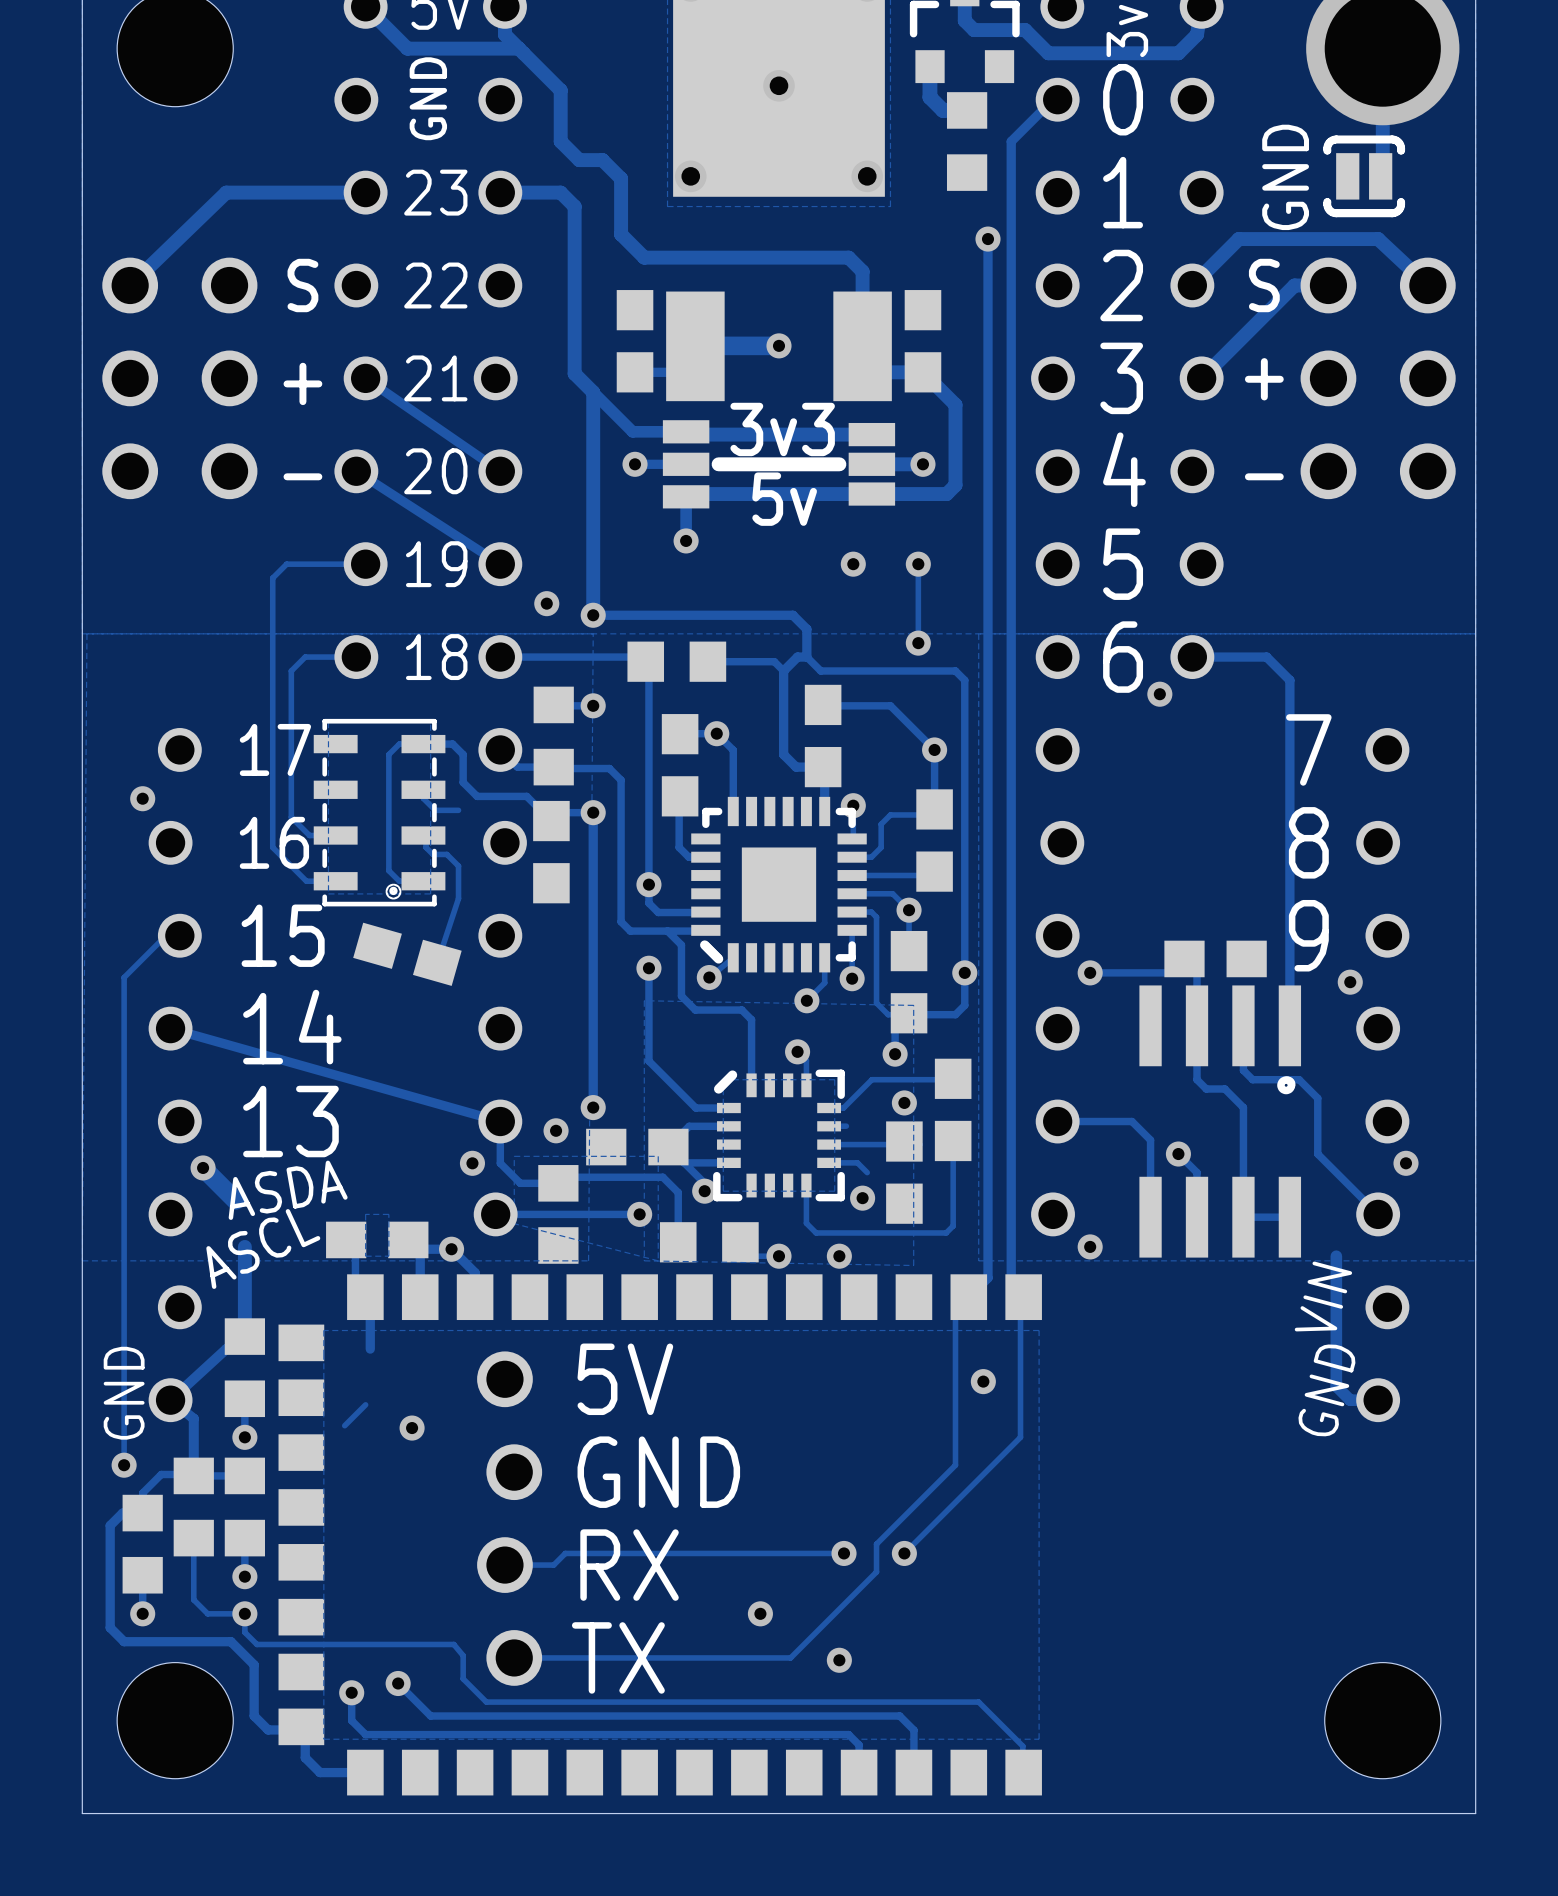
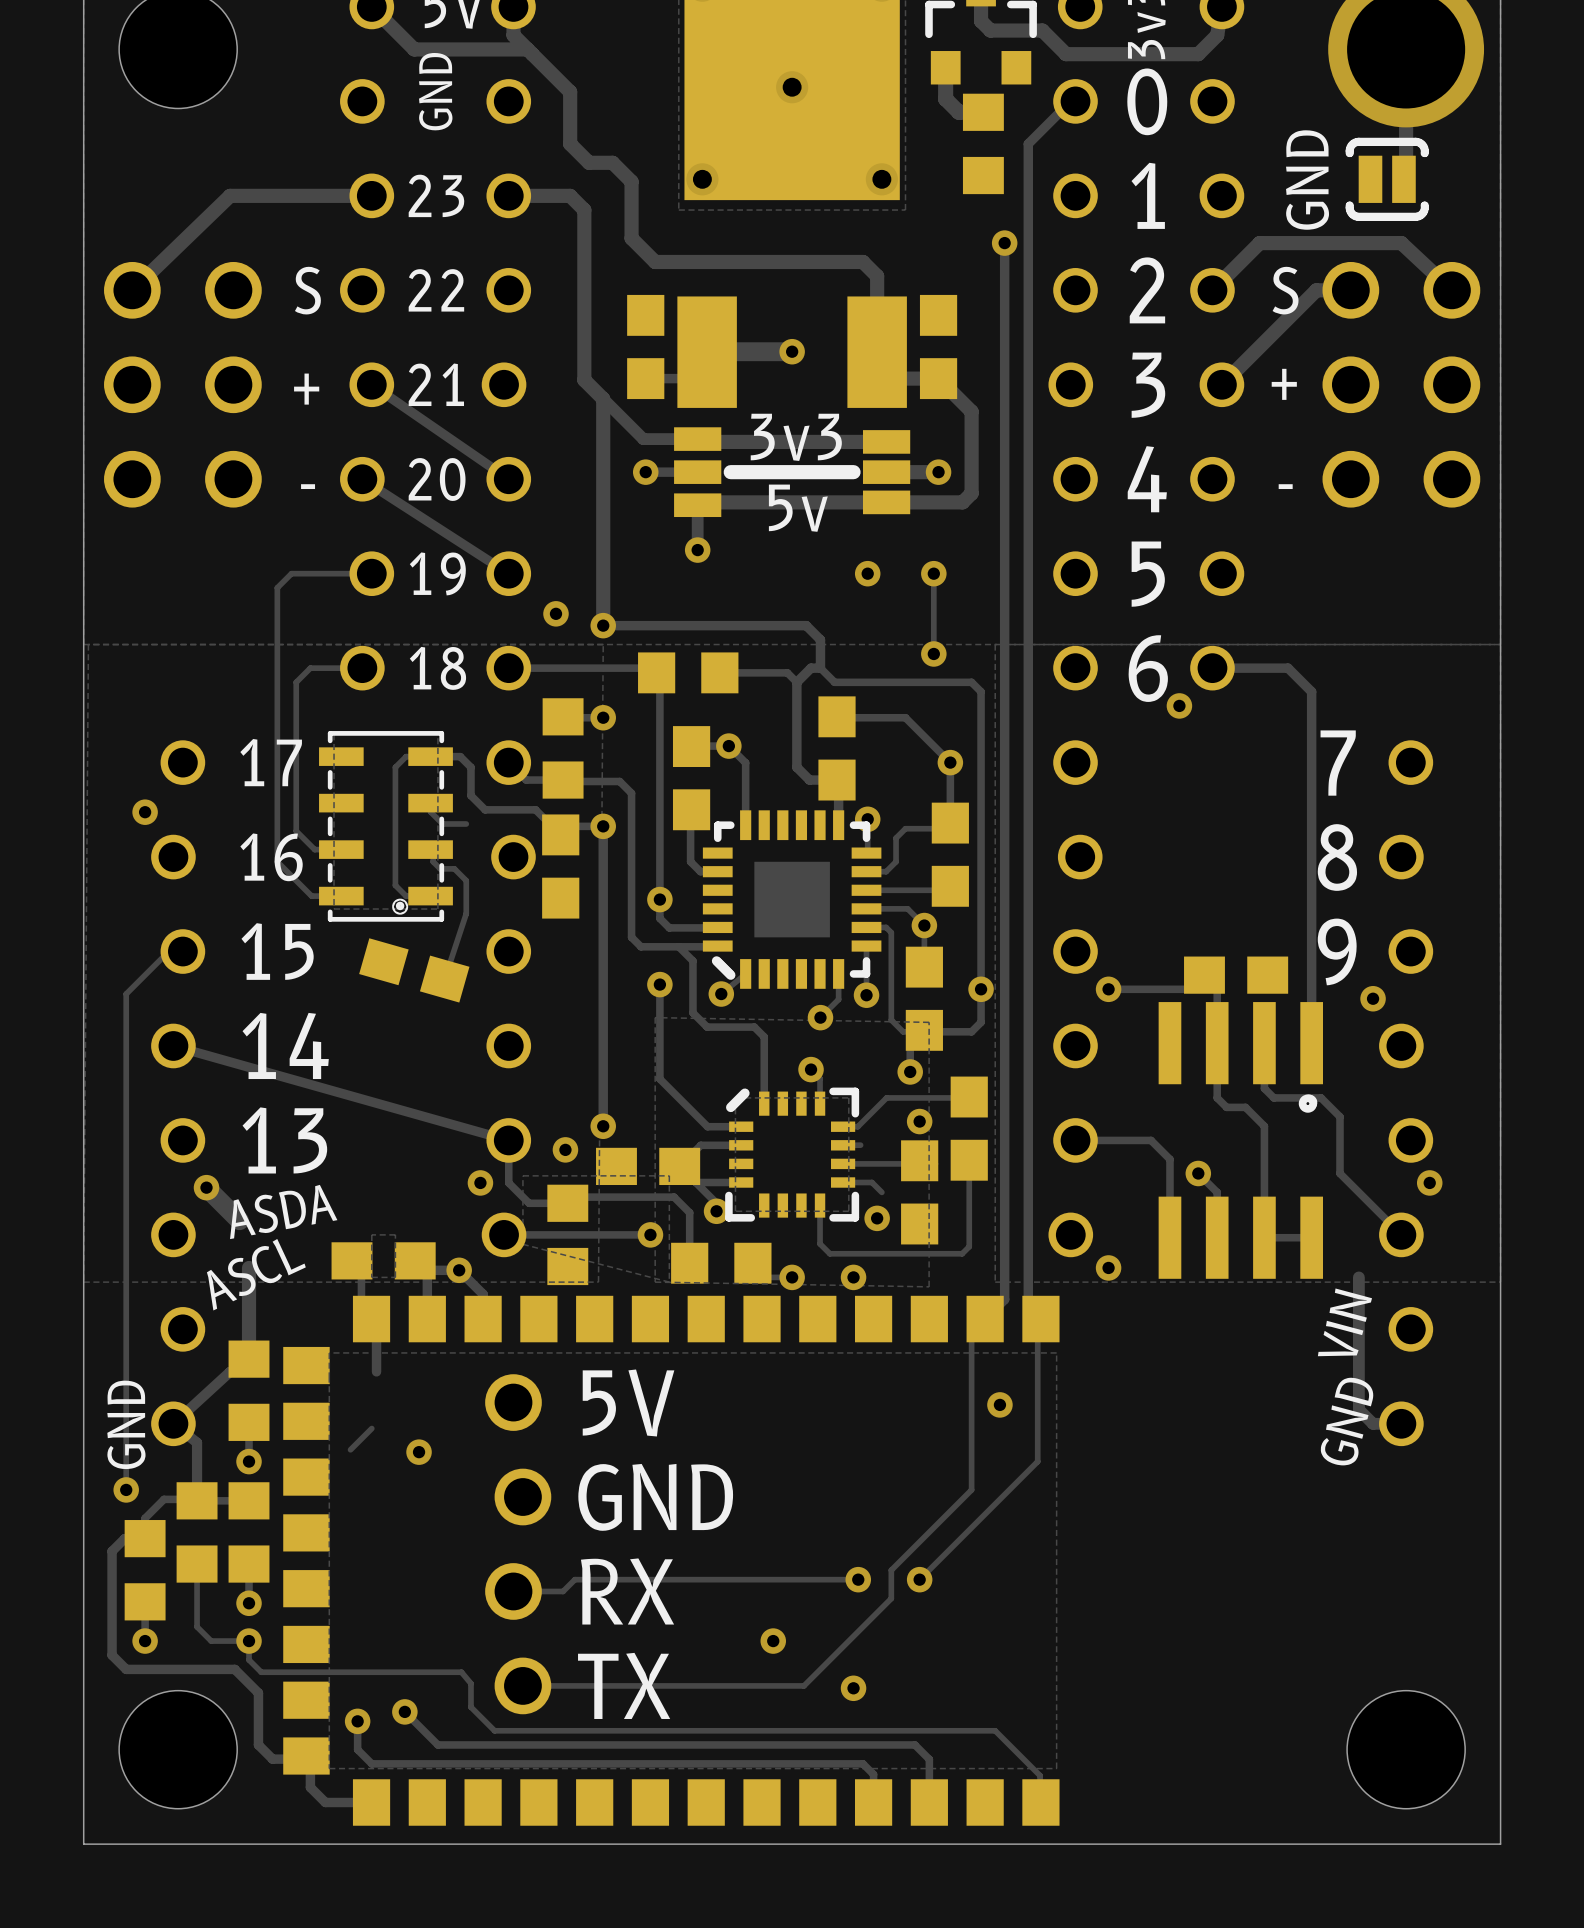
part footprint: [691, 796, 867, 973] -> [702, 810, 882, 989]

